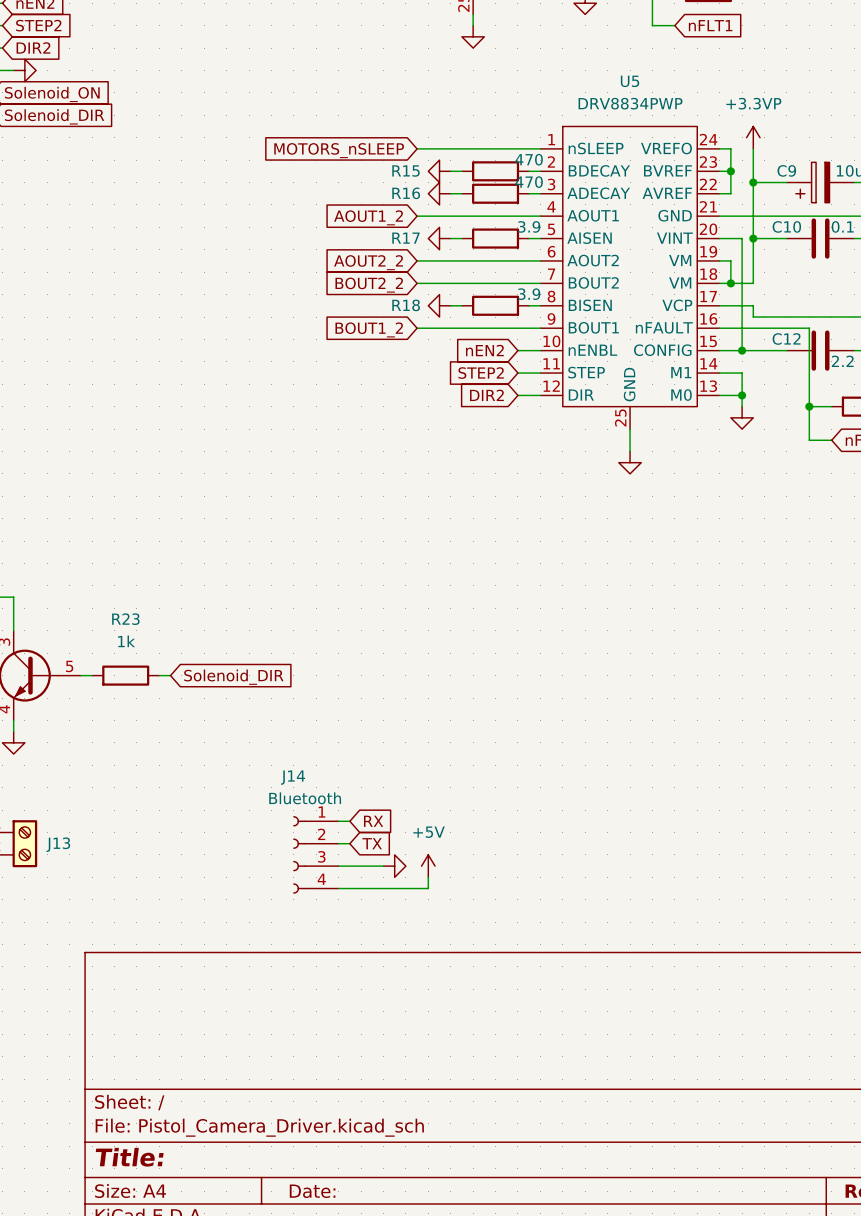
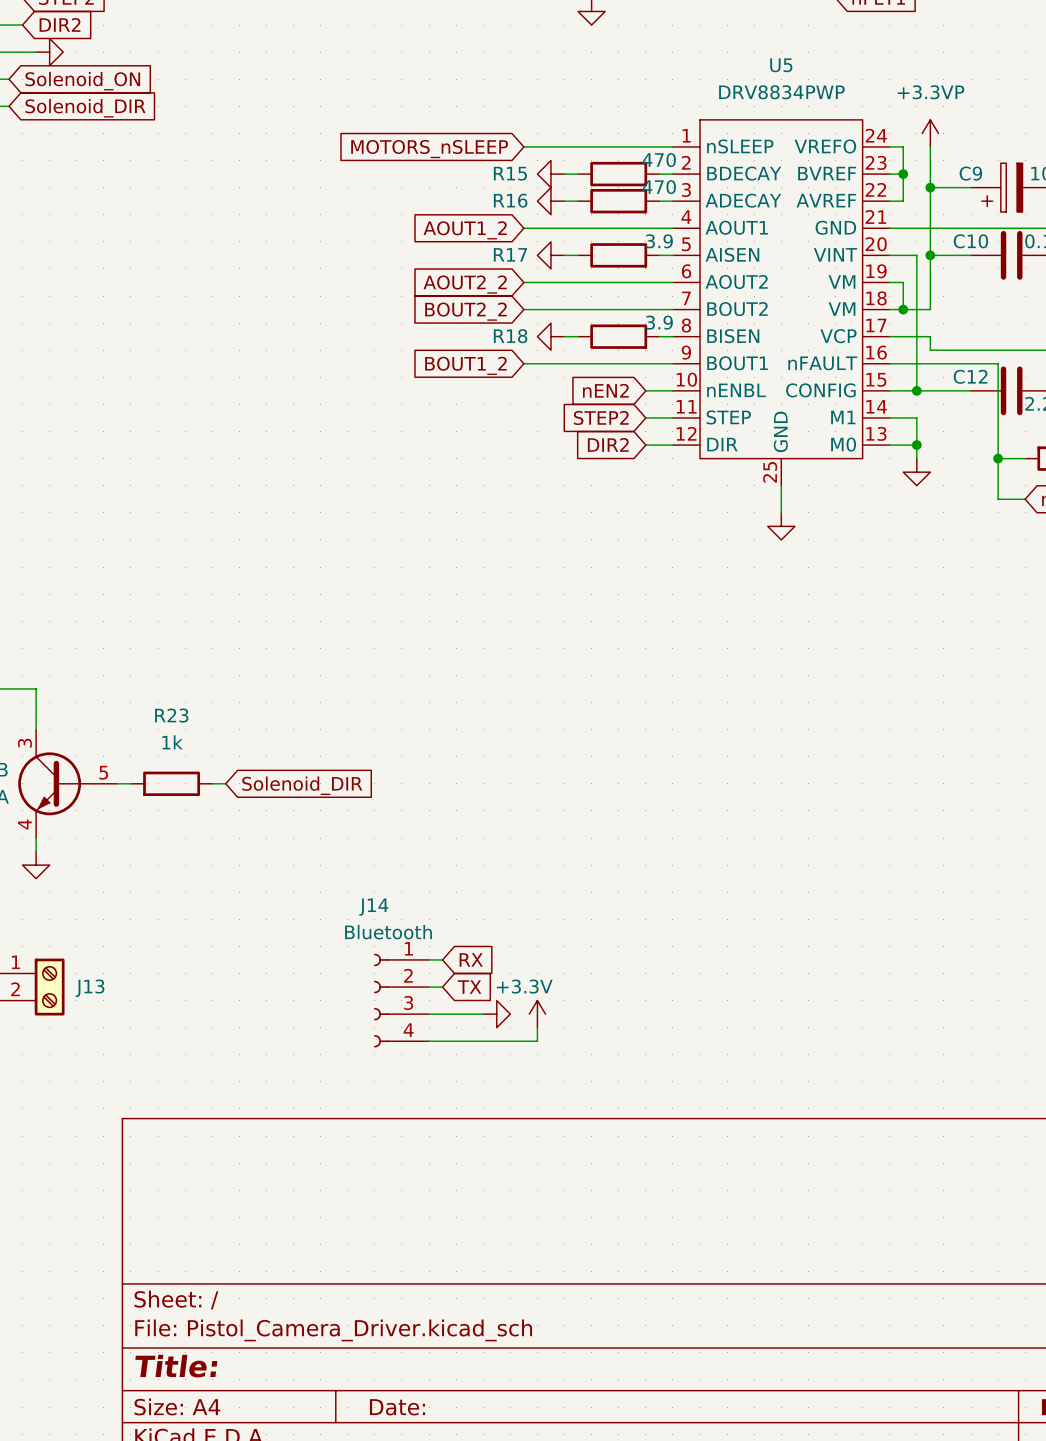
power symbol: +5V (428, 866) -> +3.3V (537, 1014)

